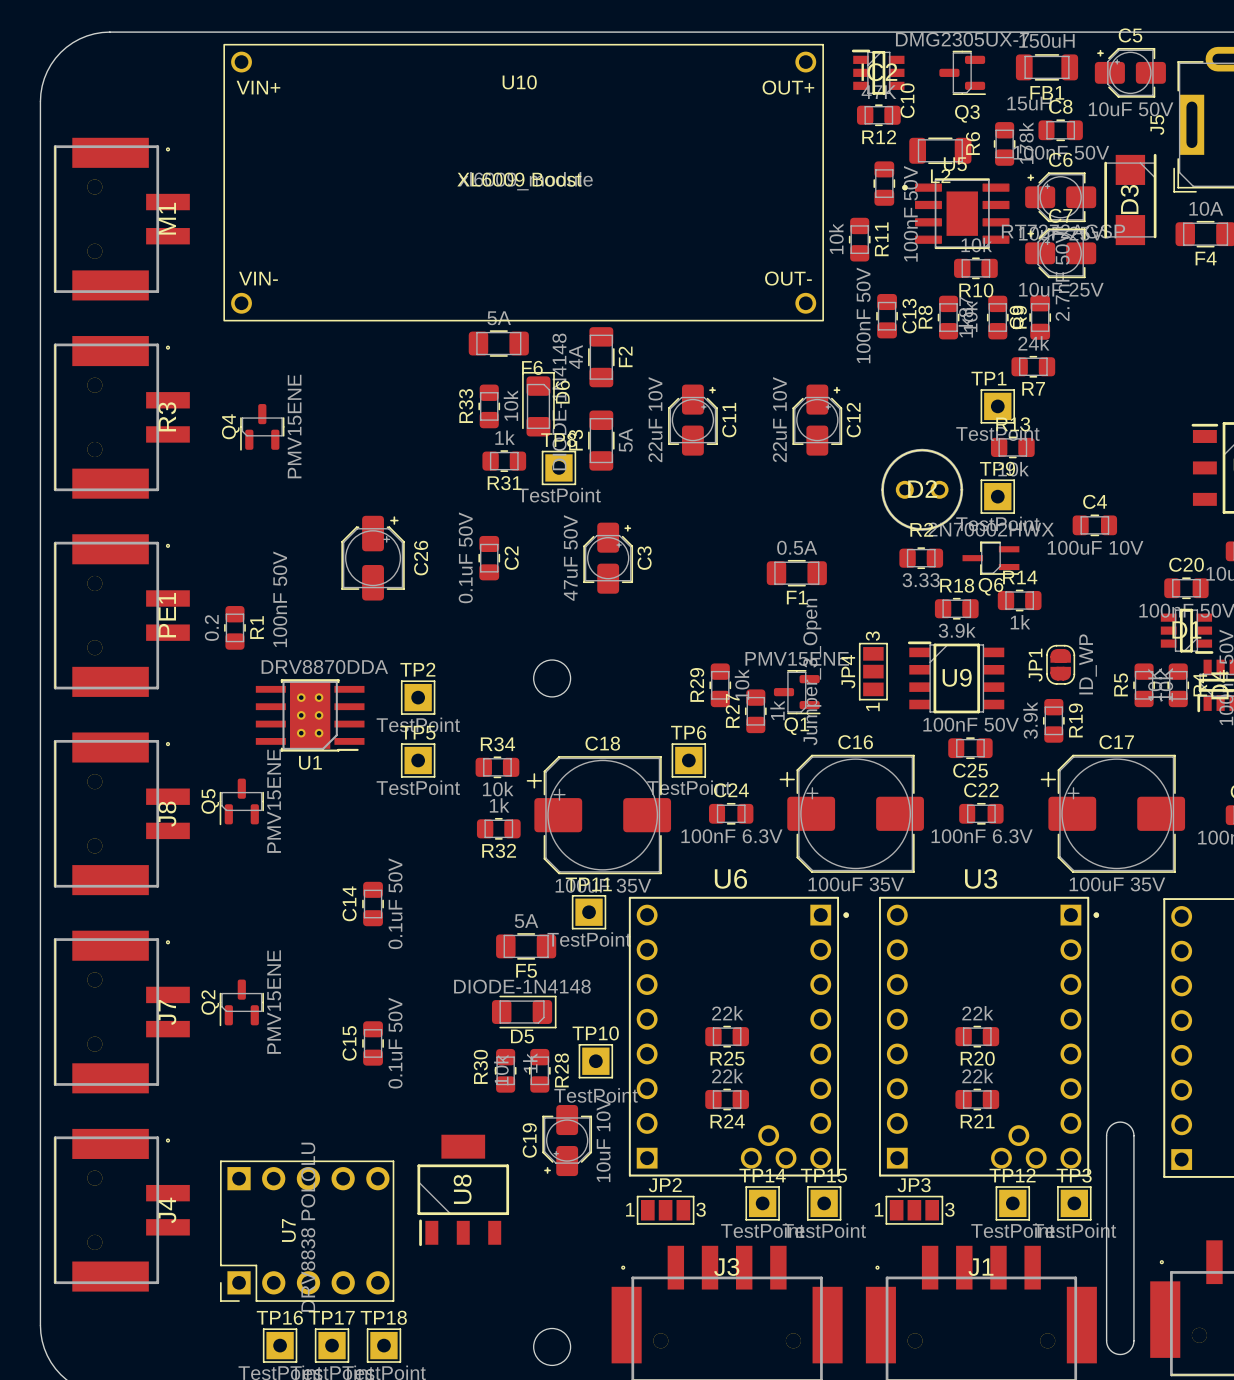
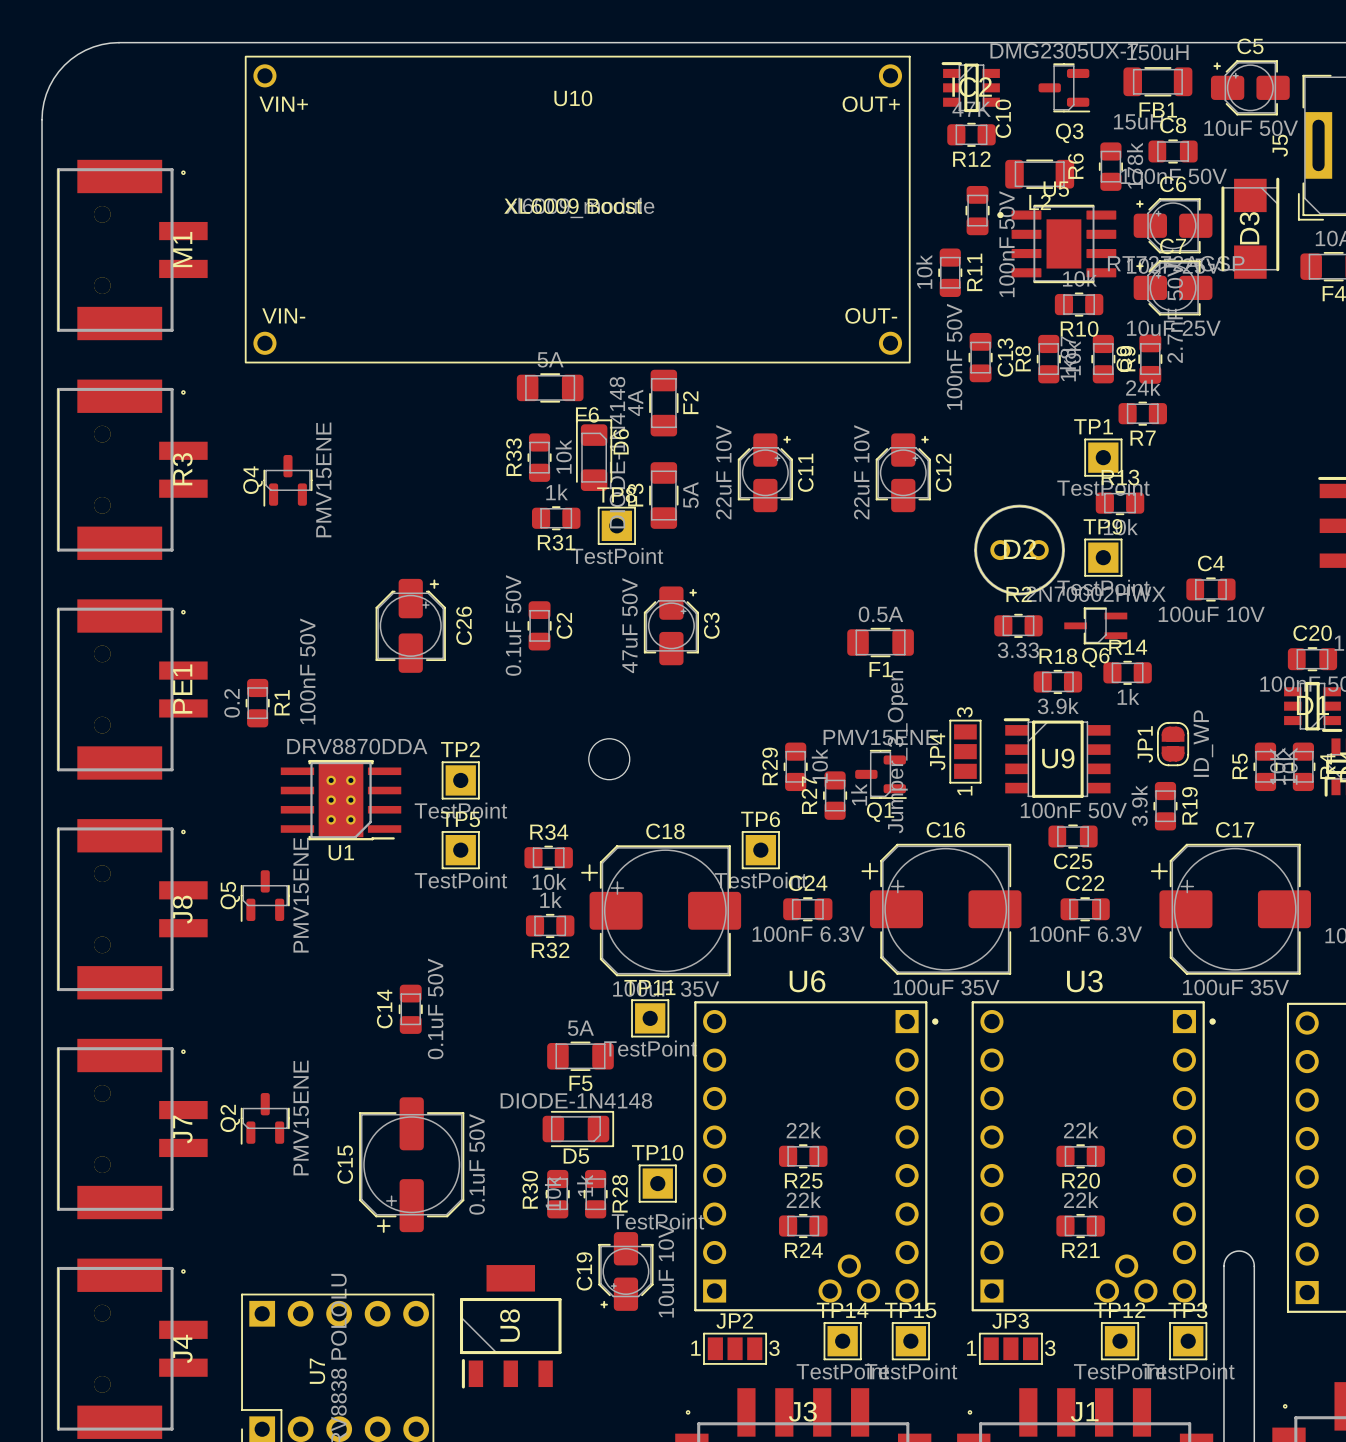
C15 footprint: [362, 1021, 384, 1066] -> [359, 1097, 465, 1233]
C15 name position: C15 (349, 1043) -> C15 (345, 1164)
C15 value position: 0.1uF 50V (395, 1043) -> 0.1uF 50V (477, 1164)

